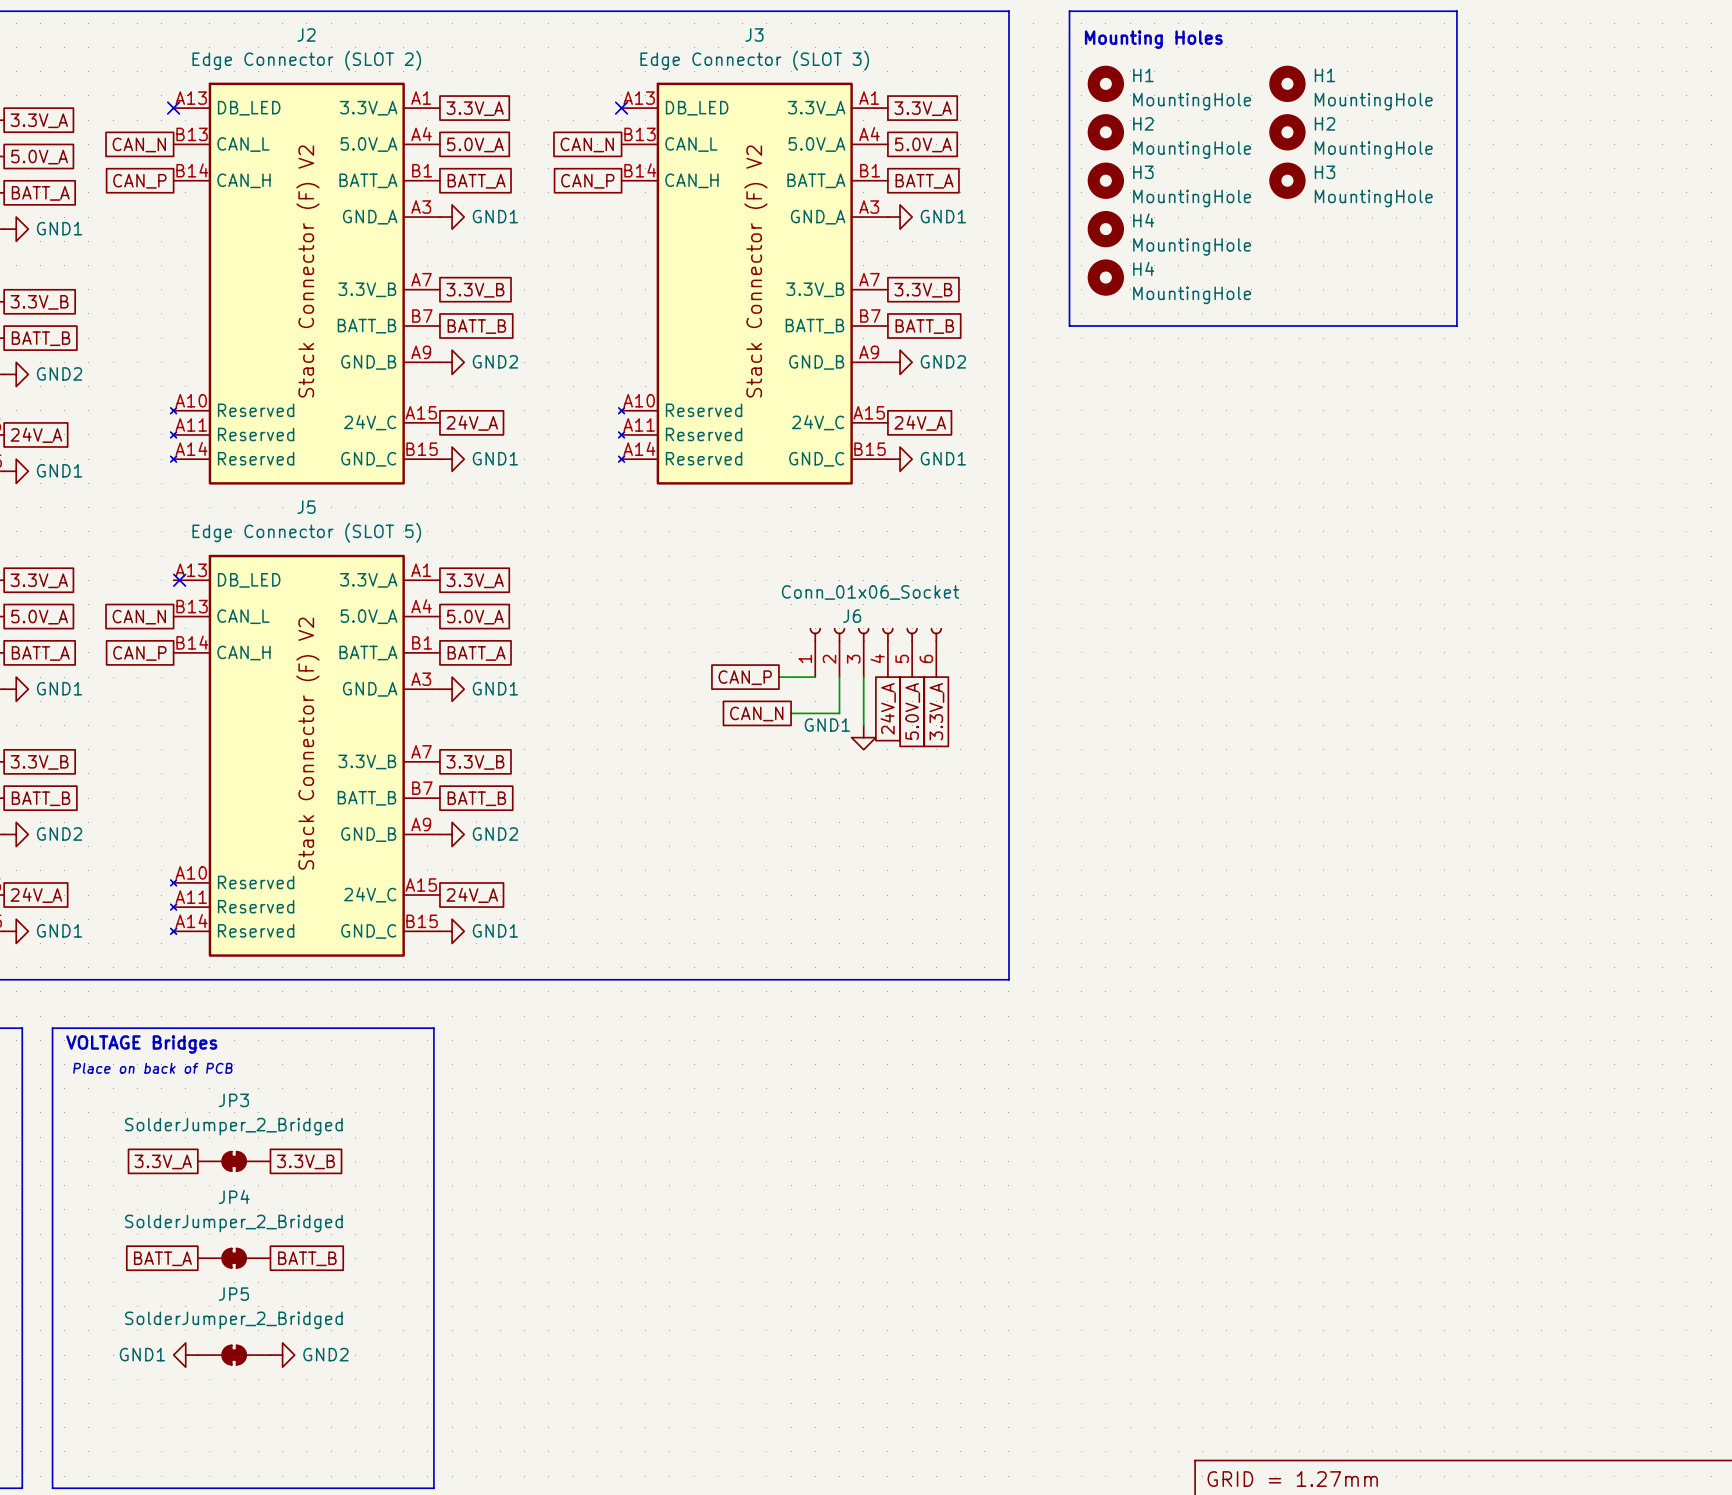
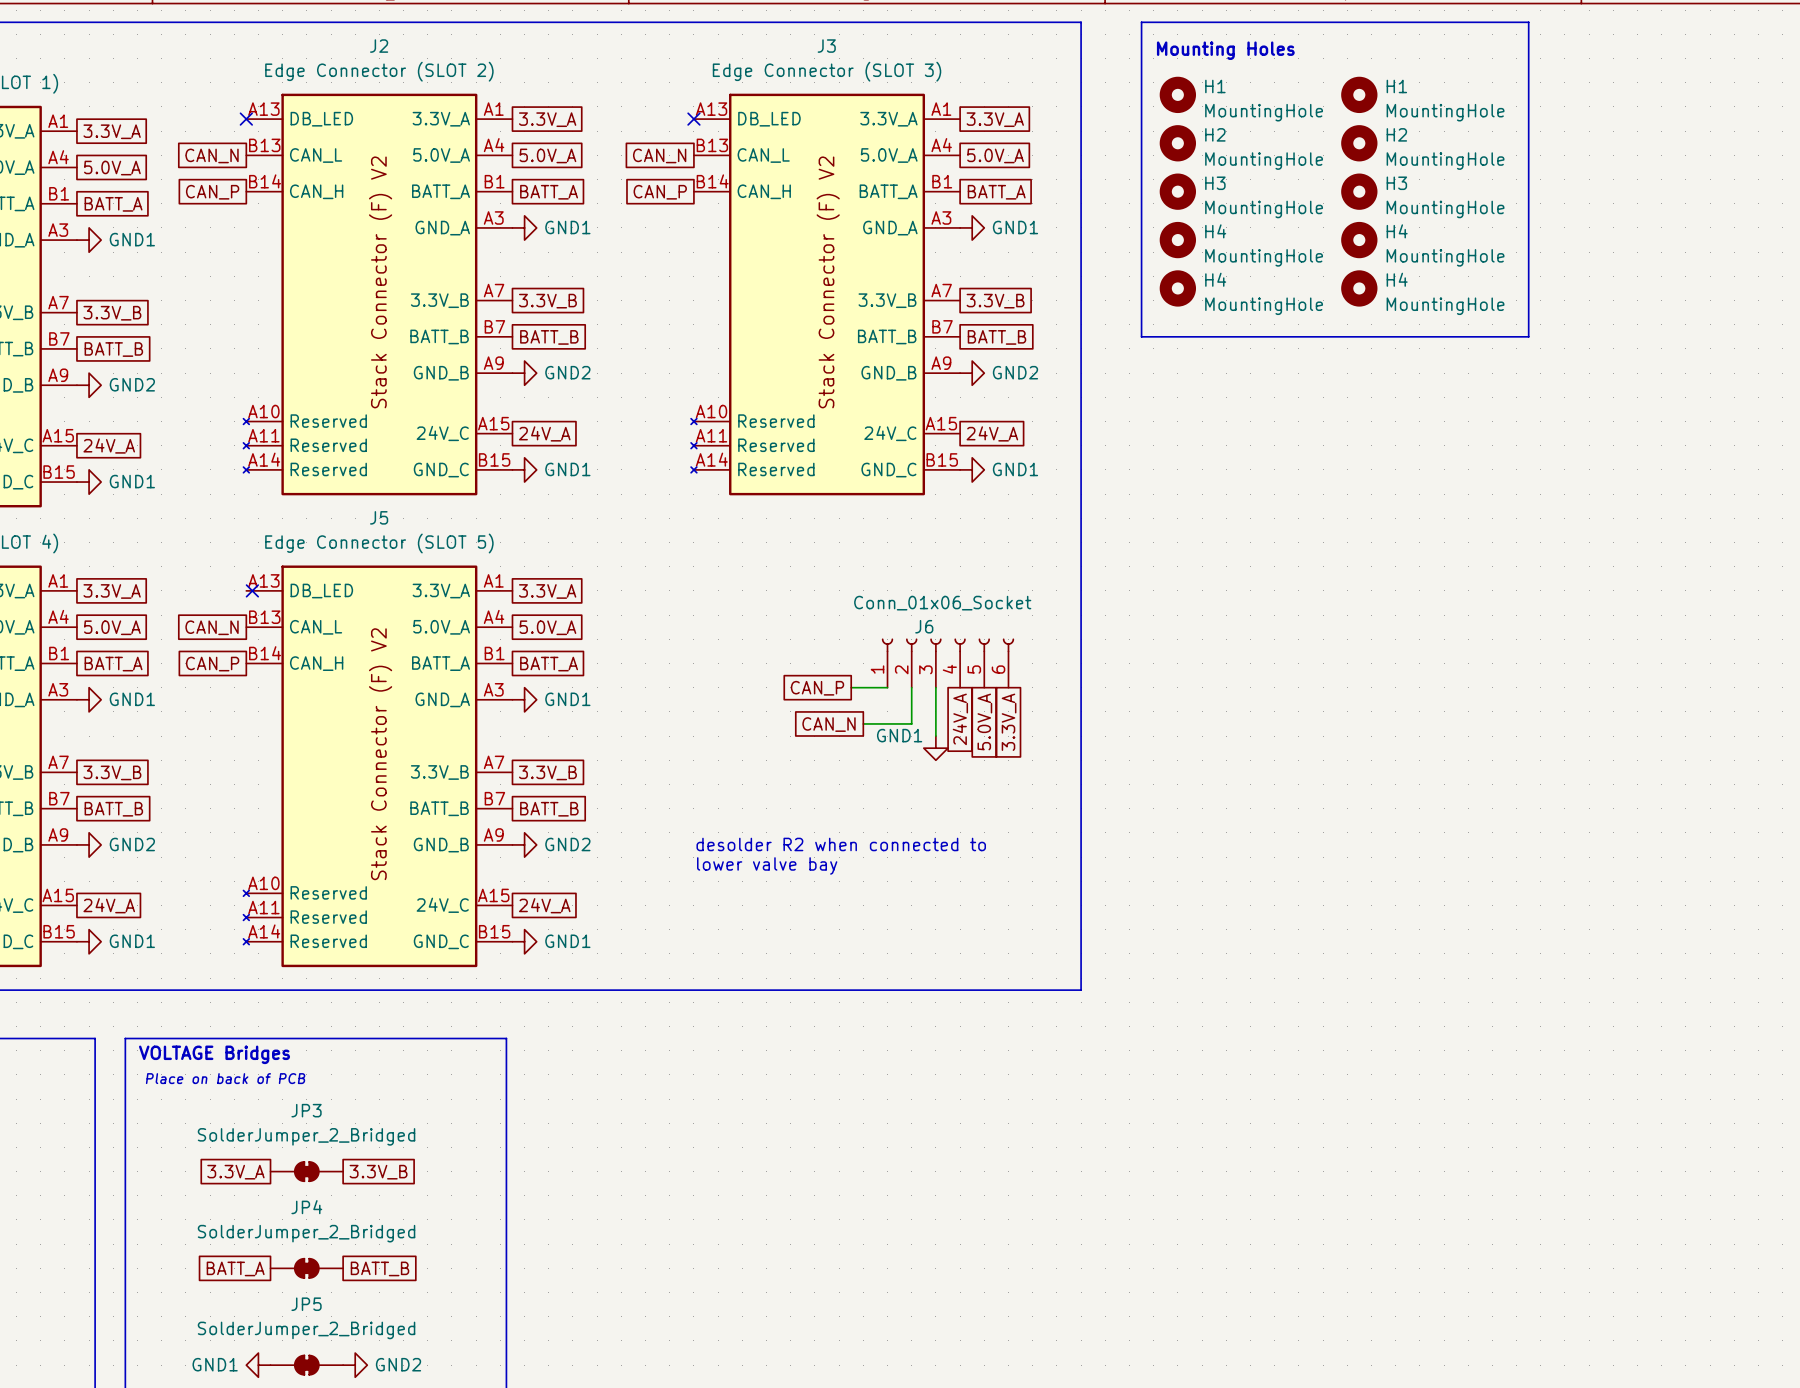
H4: none -> MountingHole (1359, 240)
H4: none -> MountingHole (1359, 288)
text: none -> desolder R2 when connected to (841, 844)
text: none -> lower valve bay (767, 865)

